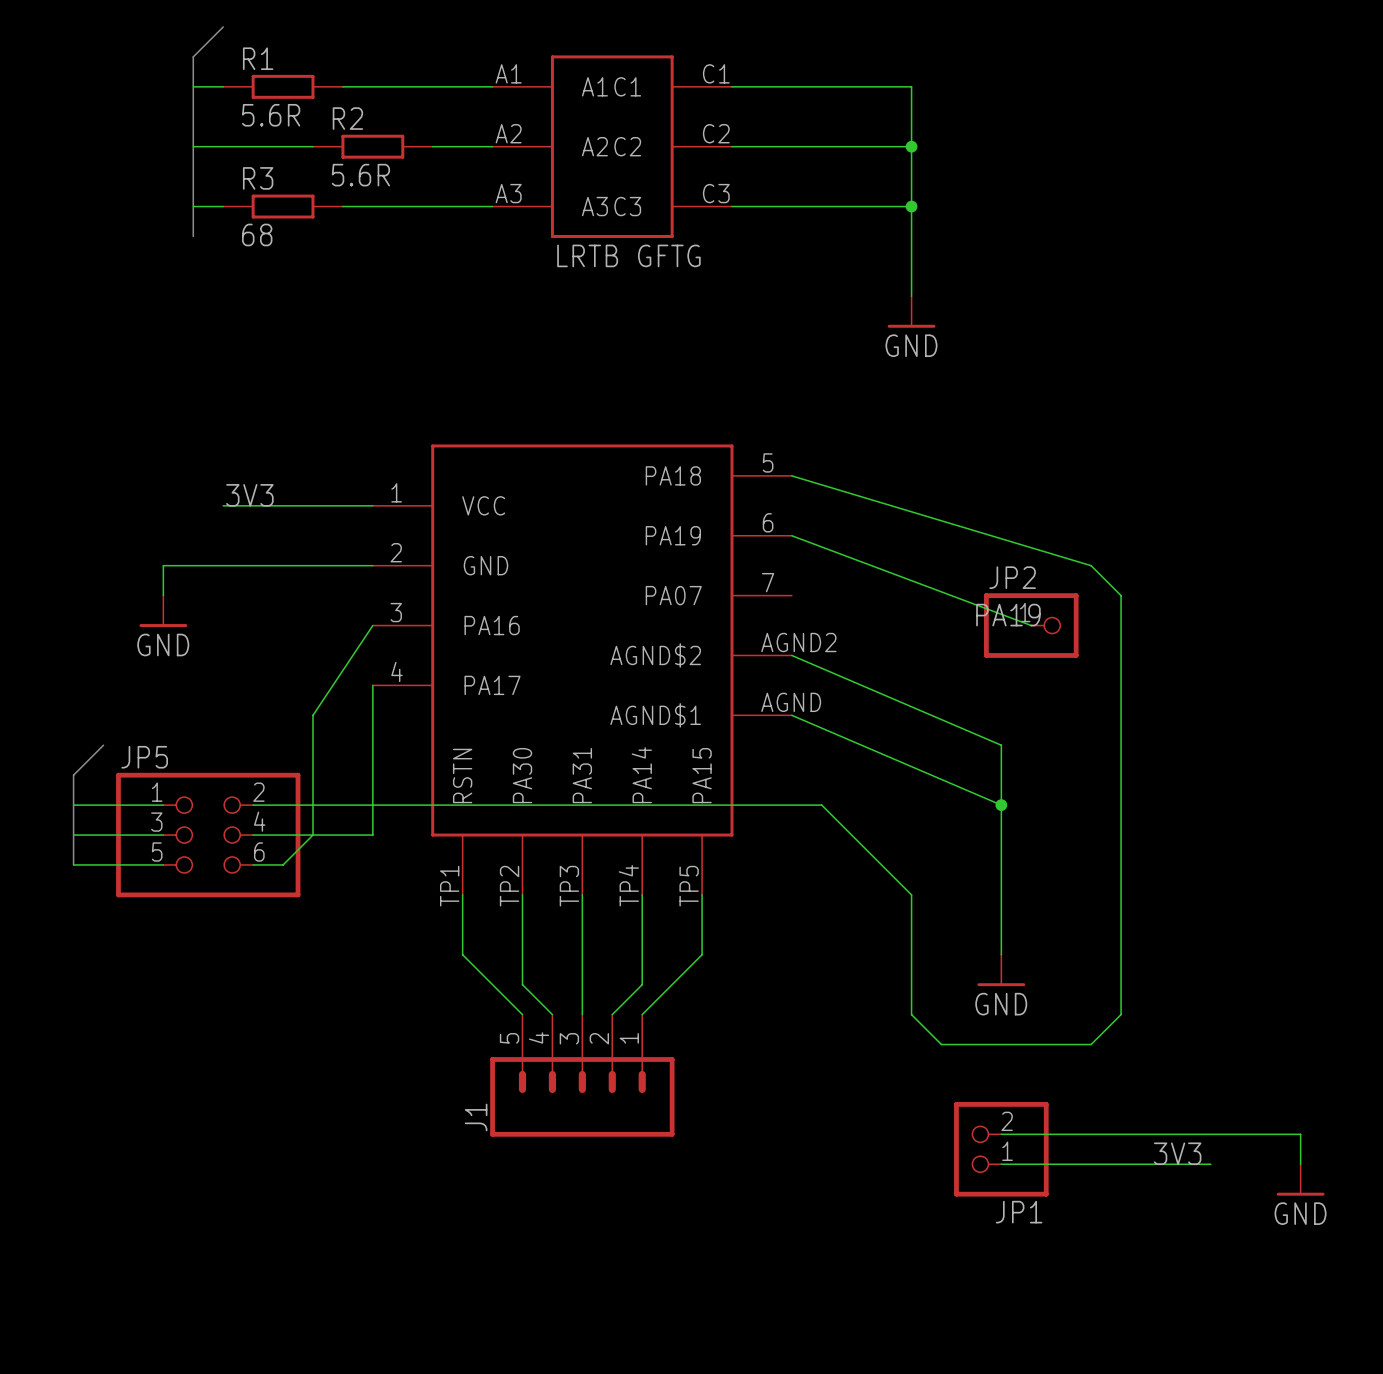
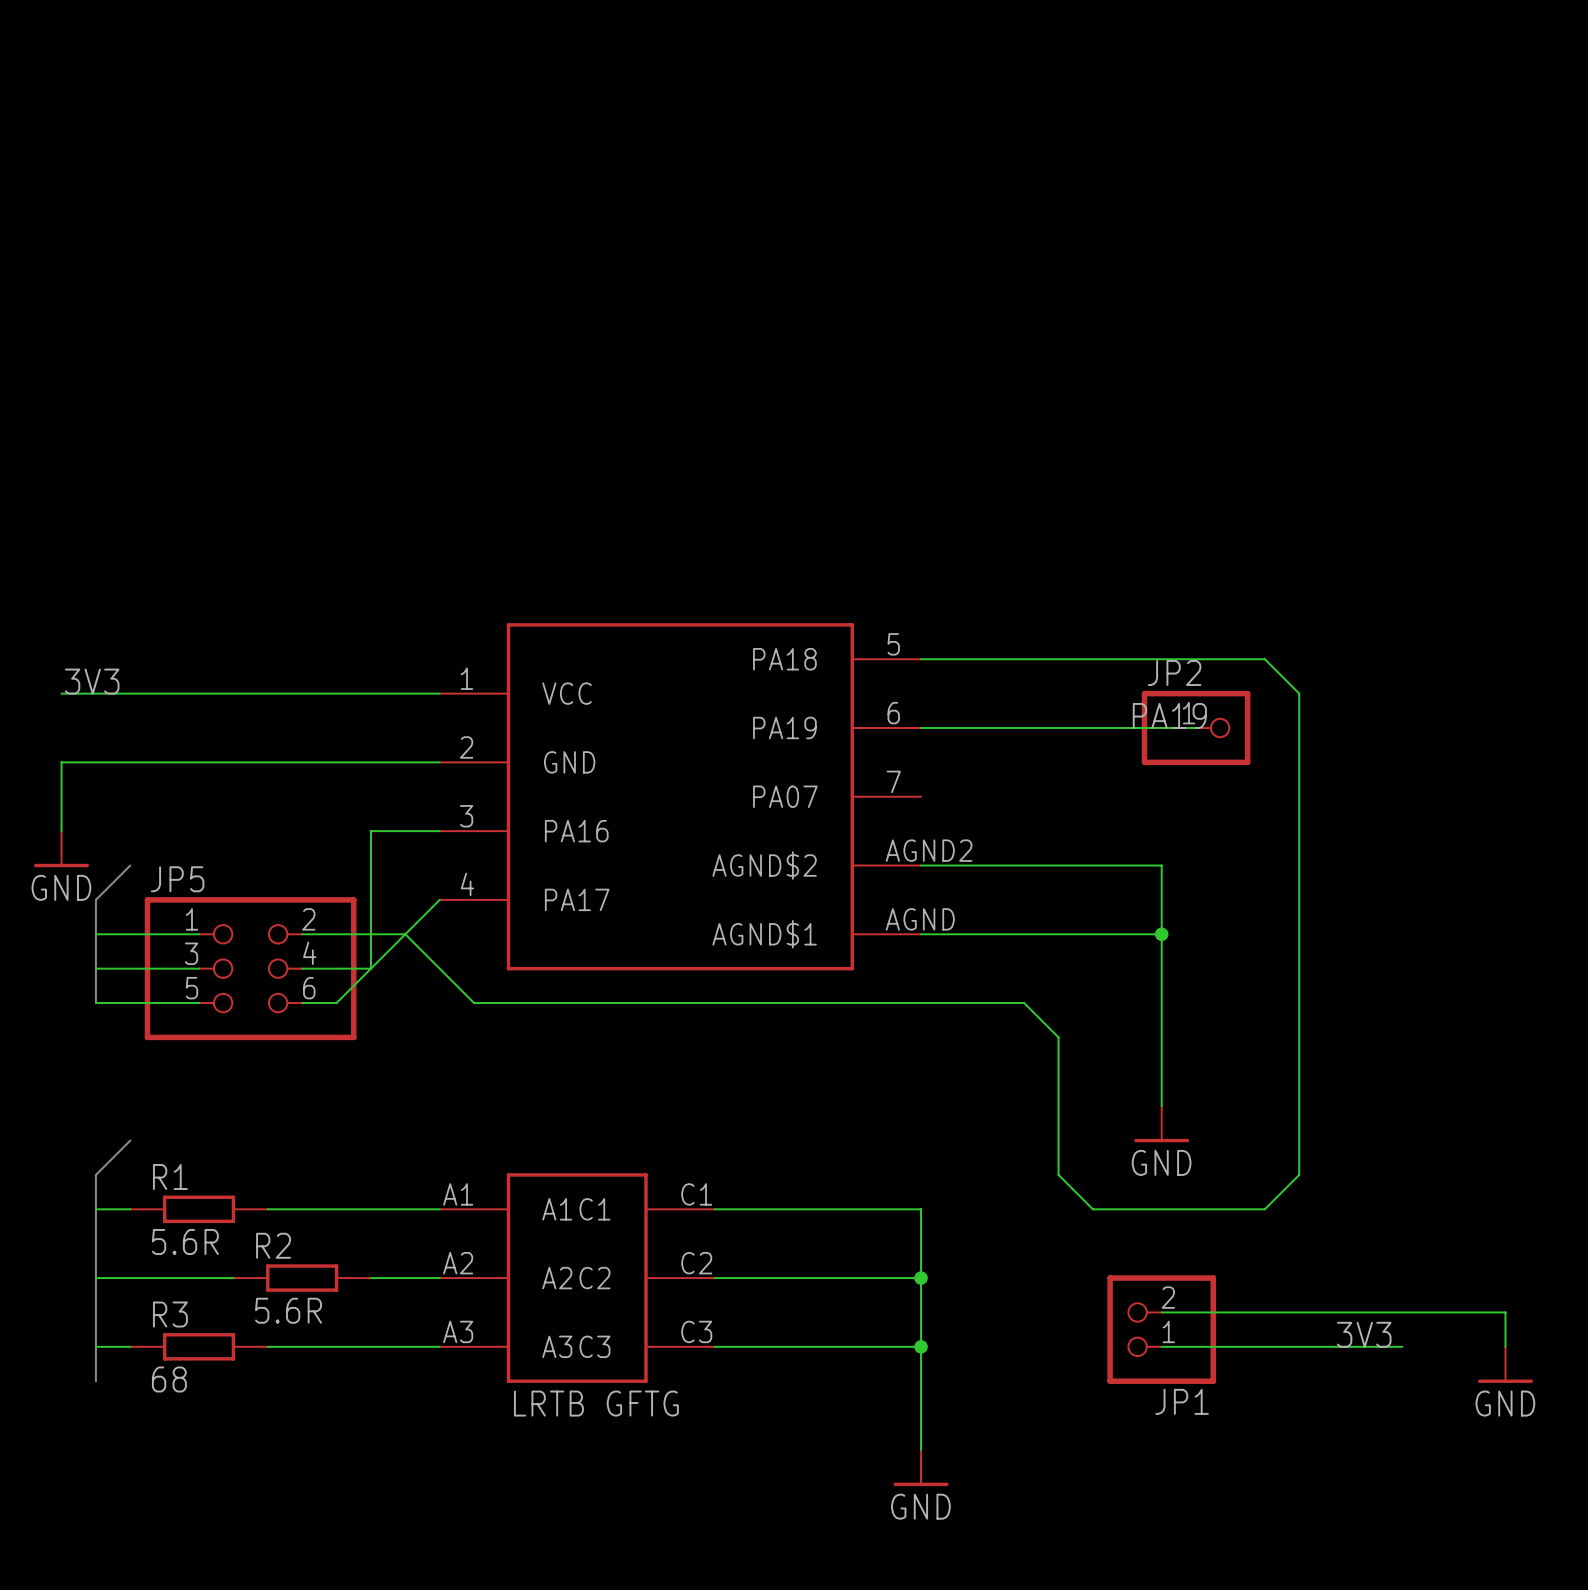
bus: (223, 26) (193, 56) (193, 236) -> none
wire: (193, 86) (223, 86) -> none
R1 position: (283, 86) -> (199, 1209)
wire: (342, 86) (492, 86) -> none
wire: (731, 86) (911, 86) (911, 296) -> none
wire: (193, 146) (313, 146) -> none
R2 position: (372, 146) -> (302, 1278)
wire: (432, 146) (492, 146) -> none
part: (612, 146) -> none
wire: (731, 146) (911, 146) -> none
junction: (911, 146) -> none
wire: (193, 206) (223, 206) -> none
R3 position: (283, 206) -> (199, 1346)
wire: (342, 206) (492, 206) -> none
wire: (731, 206) (911, 206) -> none
junction: (911, 206) -> none
power symbol: GND (911, 312) -> none
wire: (791, 475) (1091, 565) -> (921, 659) (1264, 659)
label position: 3V3 (249, 495) -> 3V3 (92, 681)
wire: (223, 505) (372, 505) -> none
wire: (791, 535) (1031, 625) -> (921, 728) (1196, 728)
wire: (372, 565) (163, 565) (163, 595) -> none
wire: none -> (61, 693) (439, 693)
power symbol position: GND (163, 611) -> GND (61, 849)
wire: (372, 625) (313, 715) -> (439, 831) (370, 831)
wire: none -> (439, 762) (61, 762) (61, 831)
wire: (791, 655) (1001, 745) -> (921, 865) (1161, 865)
part: (582, 669) -> none
wire: (372, 685) (372, 835) (313, 835) -> (439, 899) (370, 968)
part: none -> (680, 796)
wire: (791, 715) (1001, 805) -> (955, 934) (1161, 934)
wire: (342, 805) (791, 805) -> (405, 934) (474, 1003) (1024, 1003)
wire: (821, 805) (881, 864) -> none
wire: (462, 894) (462, 954) (522, 1014) -> none
wire: (522, 894) (522, 984) (552, 1014) -> none
wire: (582, 894) (582, 1014) -> none
wire: (642, 894) (642, 984) (612, 1014) -> none
wire: (702, 894) (702, 954) (642, 1014) -> none
bus: none -> (130, 1140) (95, 1174) (95, 1381)
wire: none -> (95, 1209) (130, 1209)
wire: none -> (267, 1209) (439, 1209)
wire: none -> (714, 1209) (921, 1209) (921, 1449)
J1: (582, 1075) -> none
wire: none -> (95, 1278) (233, 1278)
wire: none -> (370, 1278) (439, 1278)
part: none -> (577, 1278)
wire: none -> (714, 1278) (921, 1278)
junction: none -> (921, 1278)
wire: none -> (95, 1346) (130, 1346)
wire: none -> (267, 1346) (439, 1346)
wire: none -> (714, 1346) (921, 1346)
junction: none -> (921, 1346)
power symbol: none -> GND (921, 1468)

